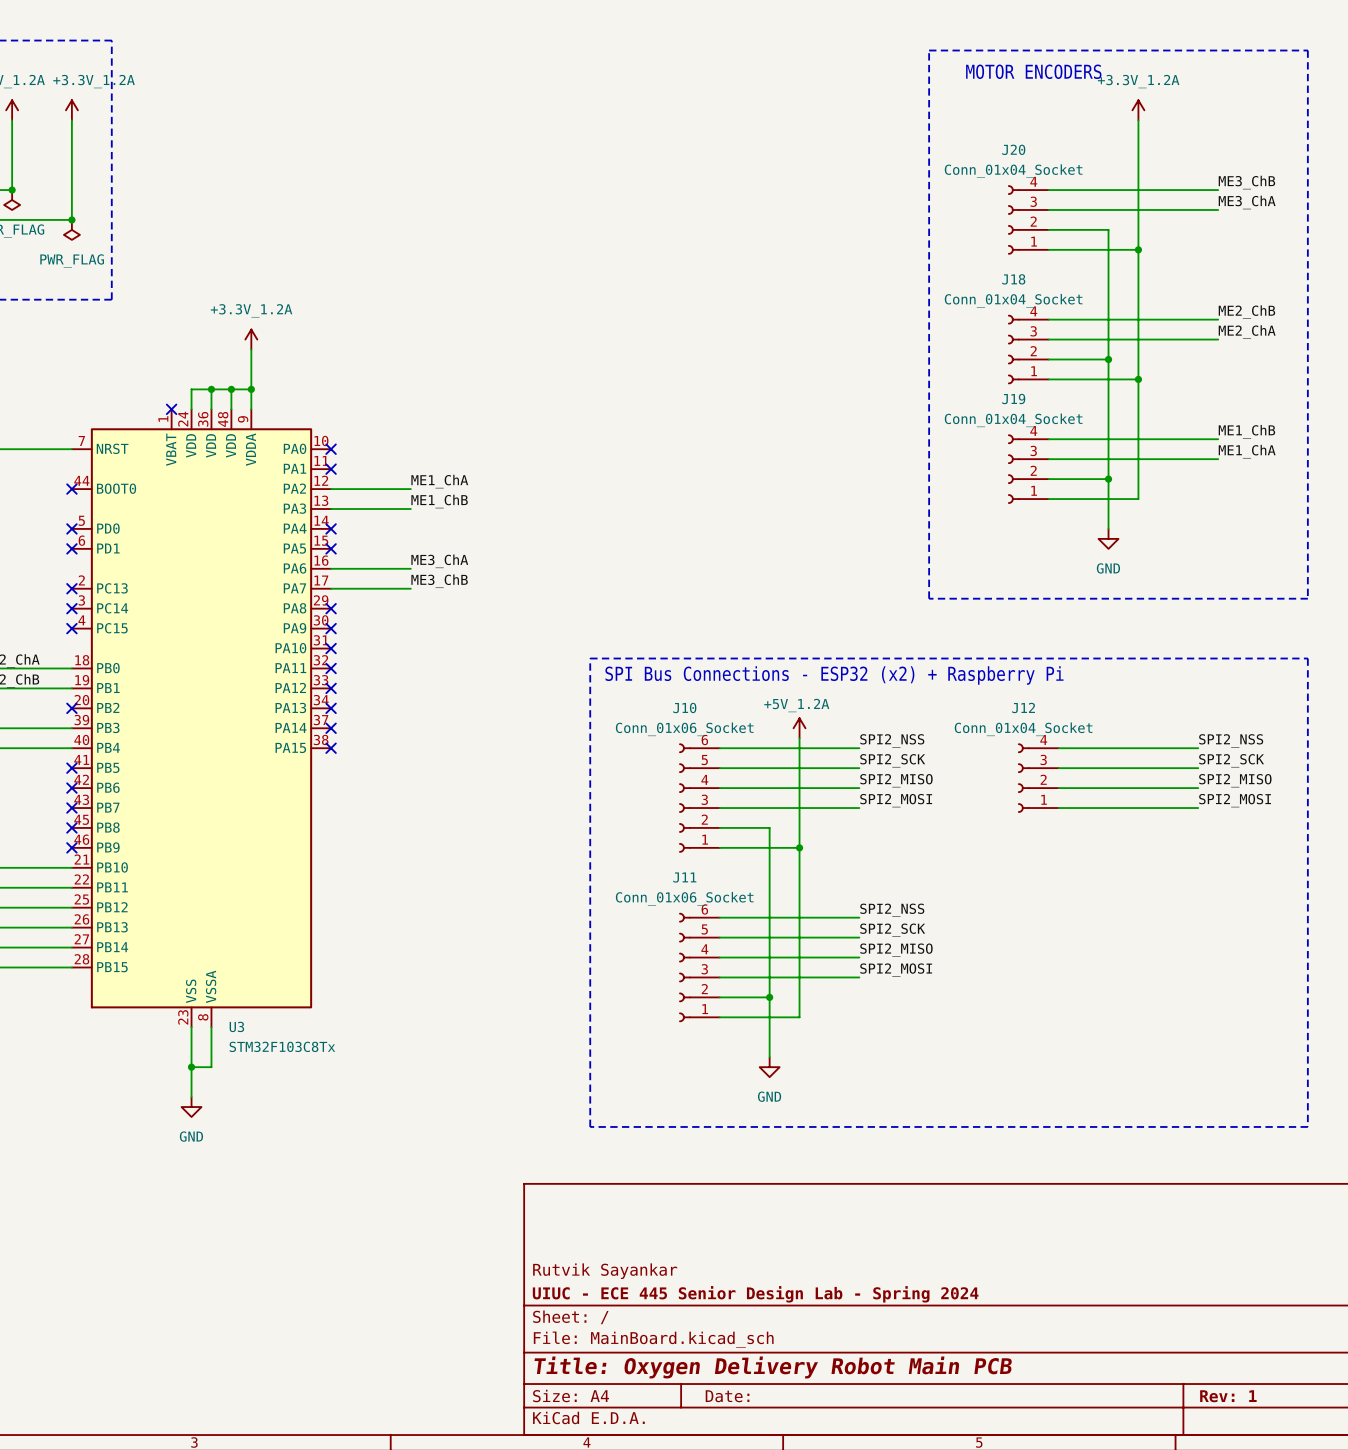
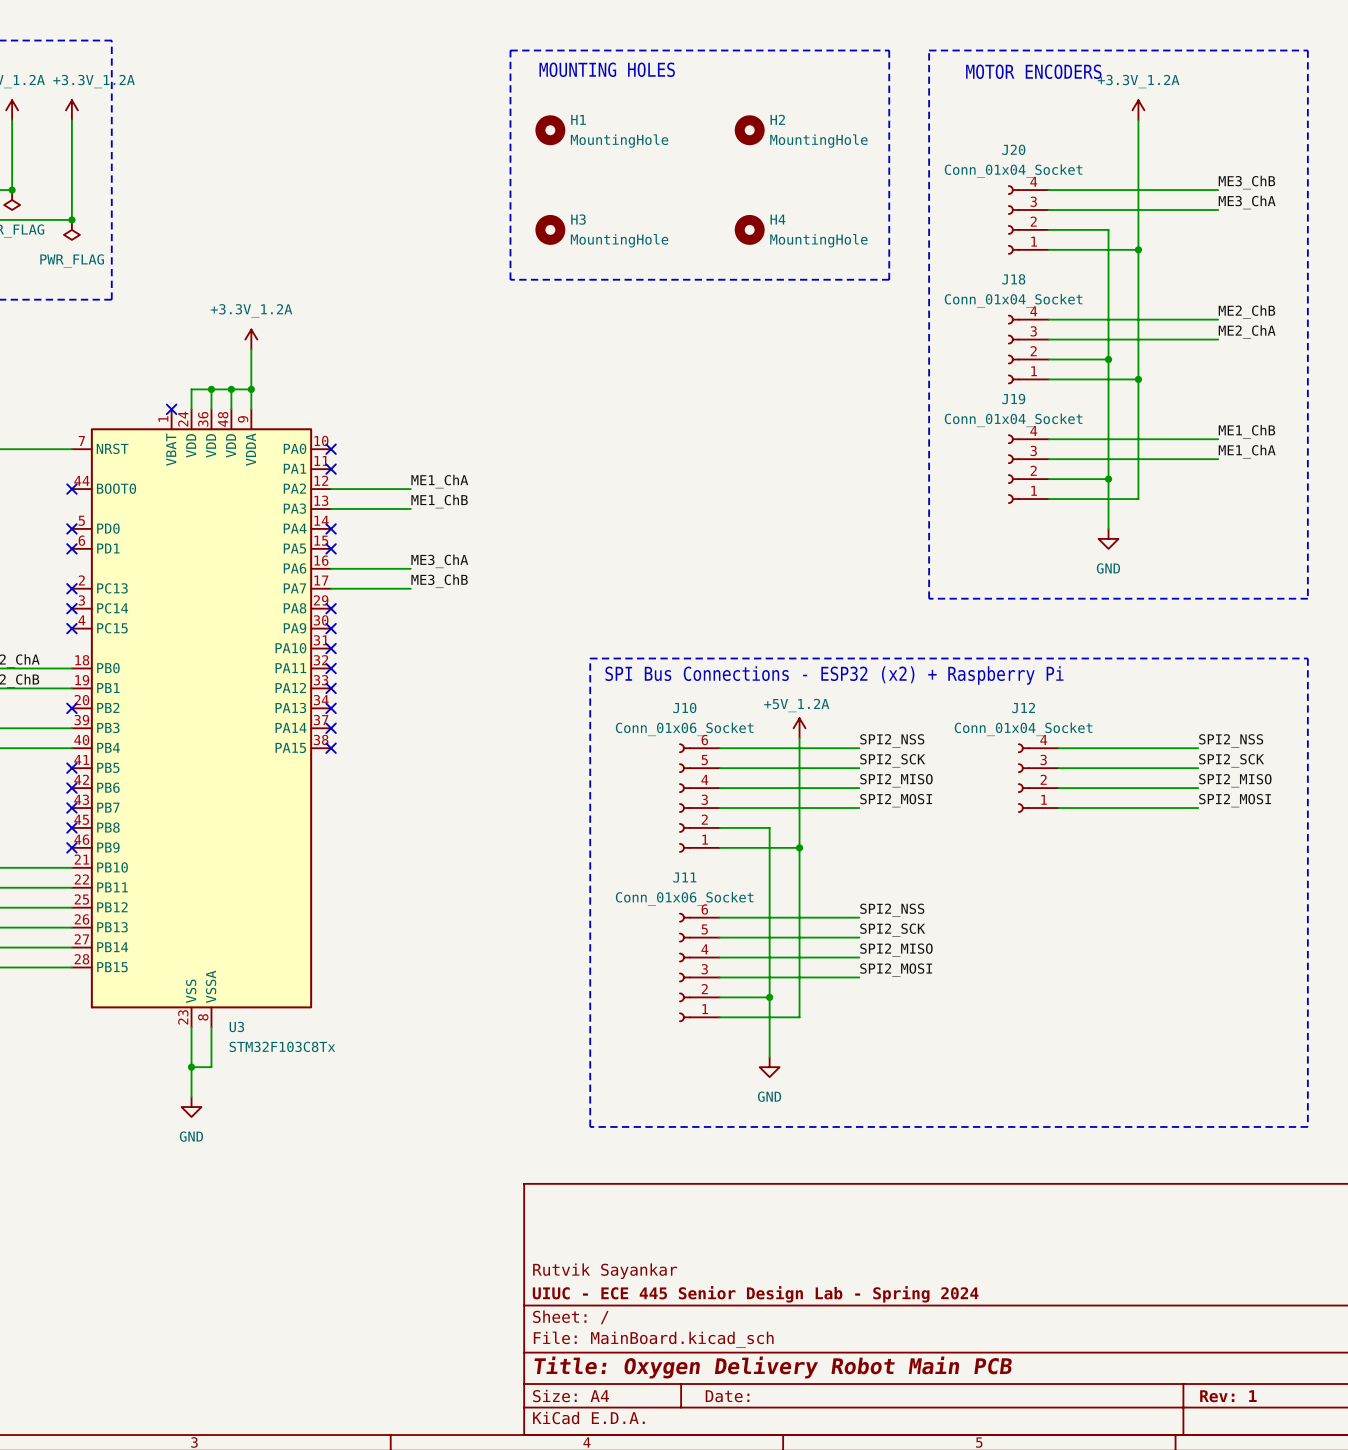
line: none -> (510, 50) (889, 50) (889, 279) (510, 279) (510, 50)
text: none -> MOUNTING HOLES (607, 69)
H1: none -> MountingHole (550, 130)
H2: none -> MountingHole (749, 130)
H3: none -> MountingHole (550, 229)
H4: none -> MountingHole (749, 229)

